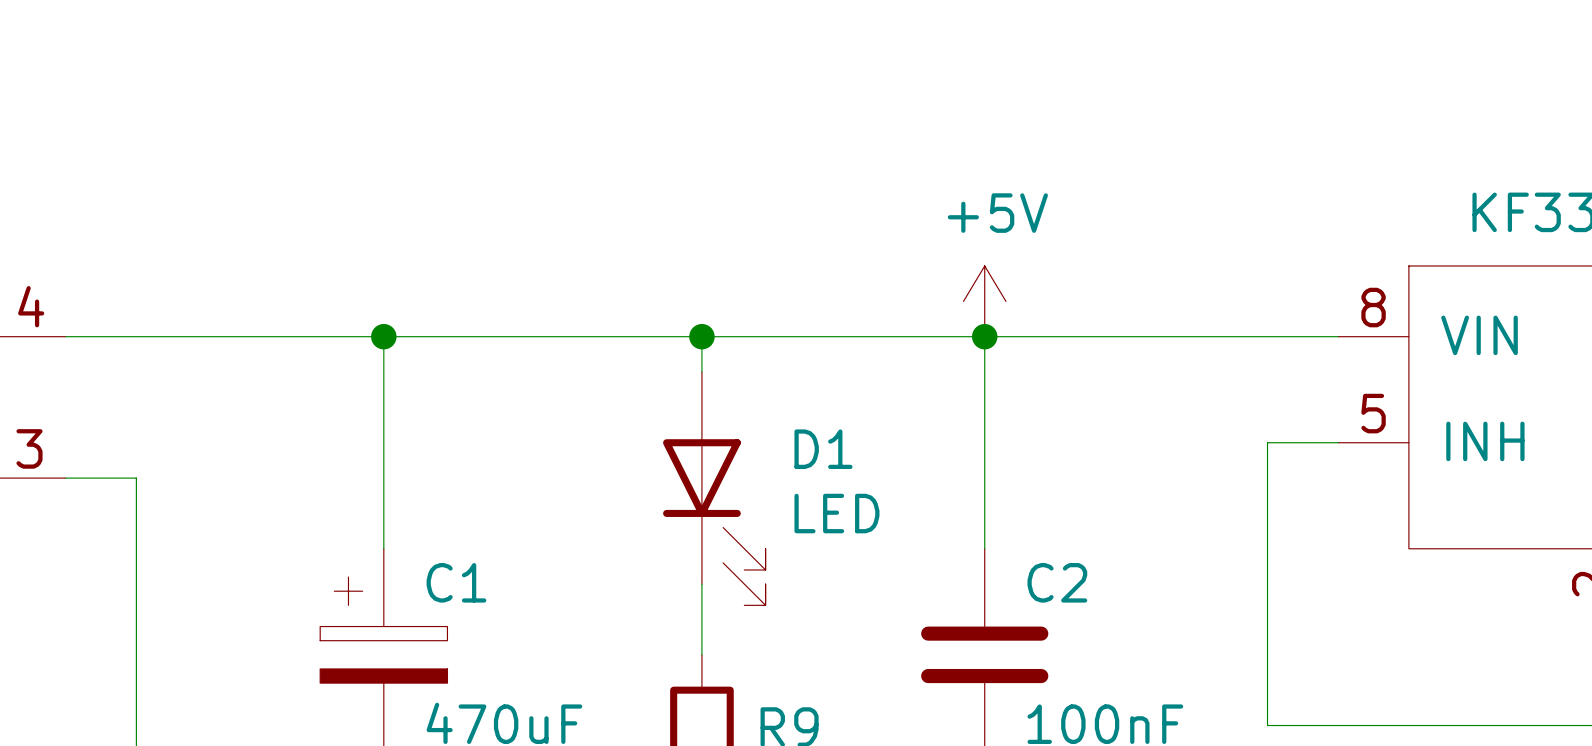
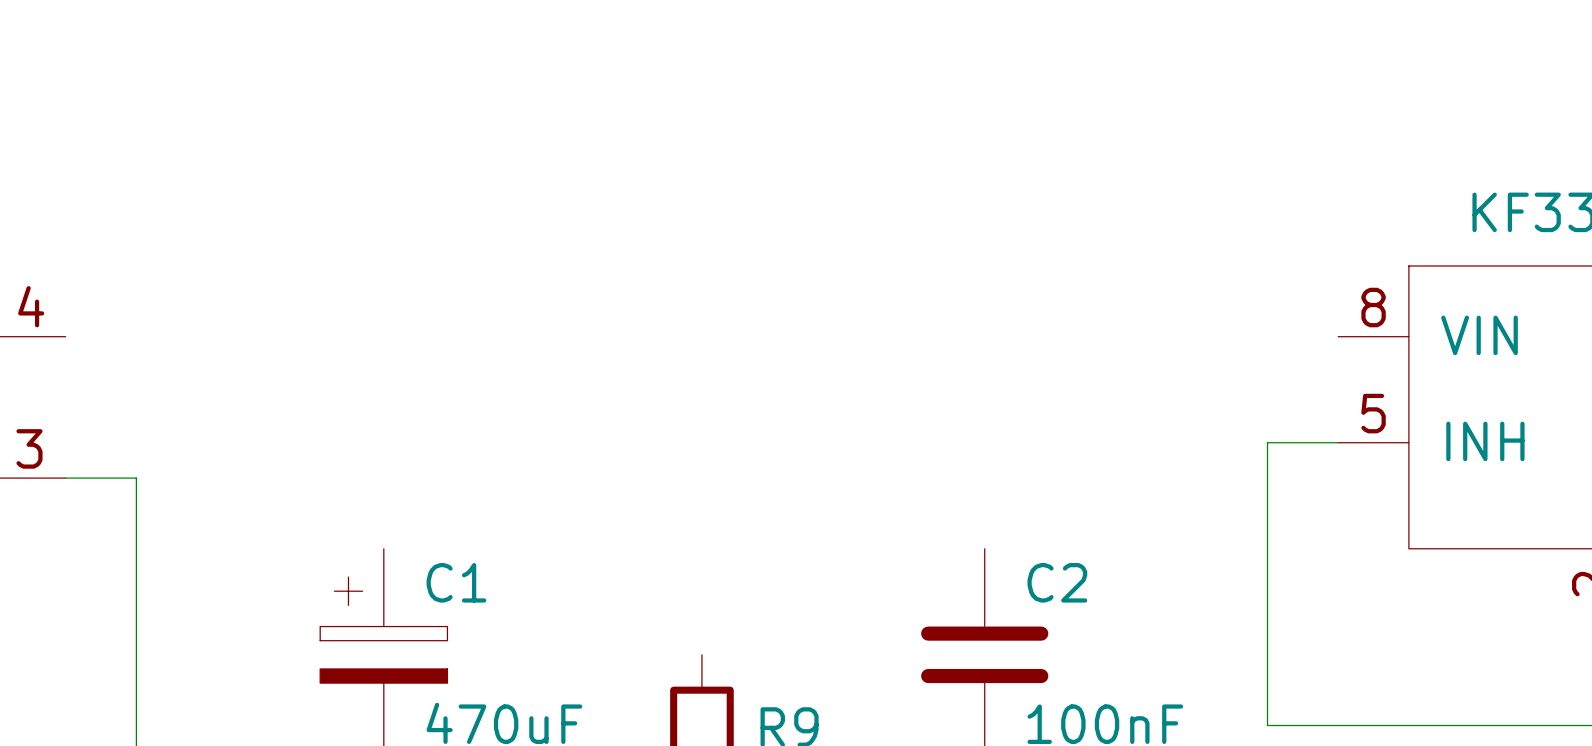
power symbol: +5V (984, 301) -> none
wire: (65, 336) (1338, 336) -> none
wire: (383, 336) (383, 548) -> none
junction: (383, 336) -> none
wire: (701, 336) (701, 372) -> none
junction: (701, 336) -> none
wire: (984, 336) (984, 548) -> none
junction: (984, 336) -> none
D1: LED (714, 488) -> none
wire: (701, 584) (701, 654) -> none

